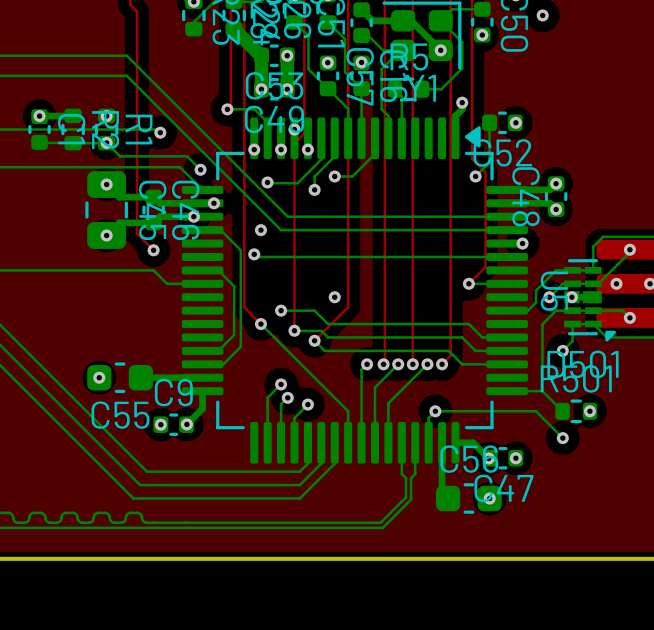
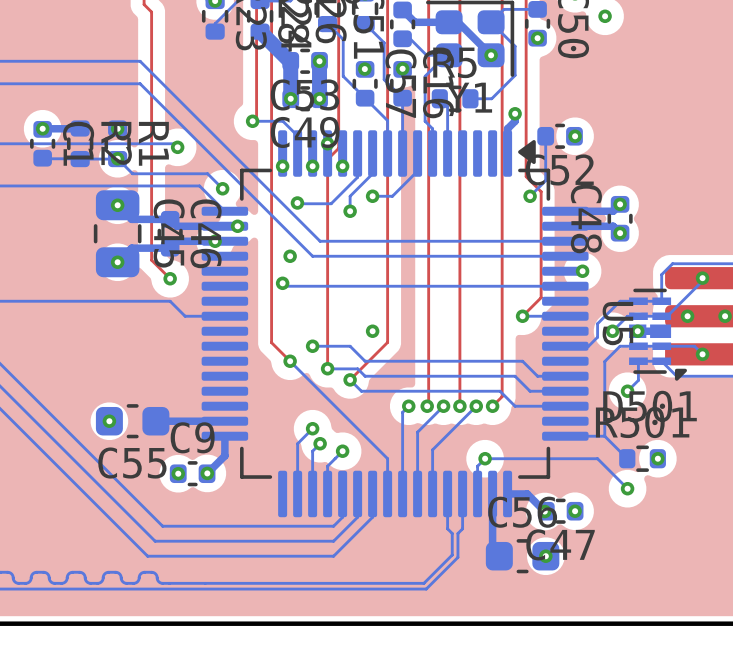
bottom track: (220, 230) (240, 250) (240, 346) (223, 364) (202, 364) -> none
bottom track: (213, 270) (218, 270) (234, 286) (234, 335) (218, 350) (202, 350) -> none

